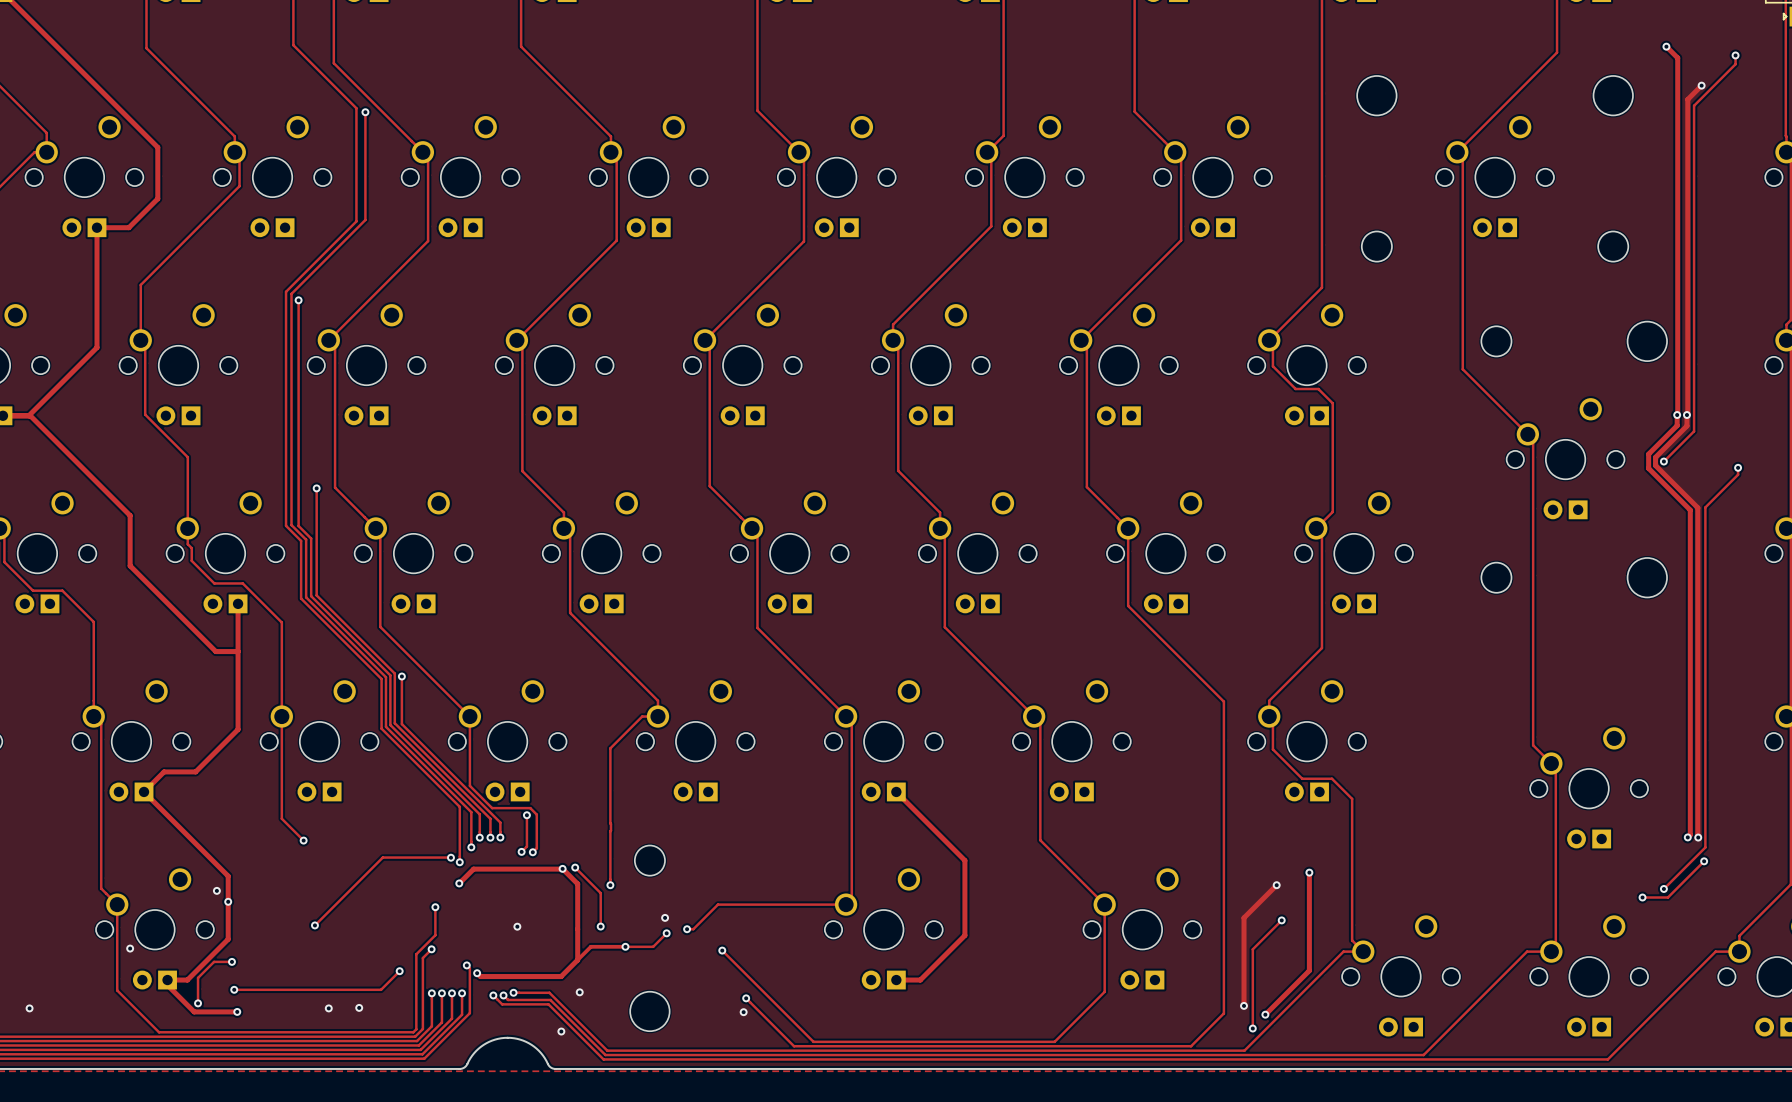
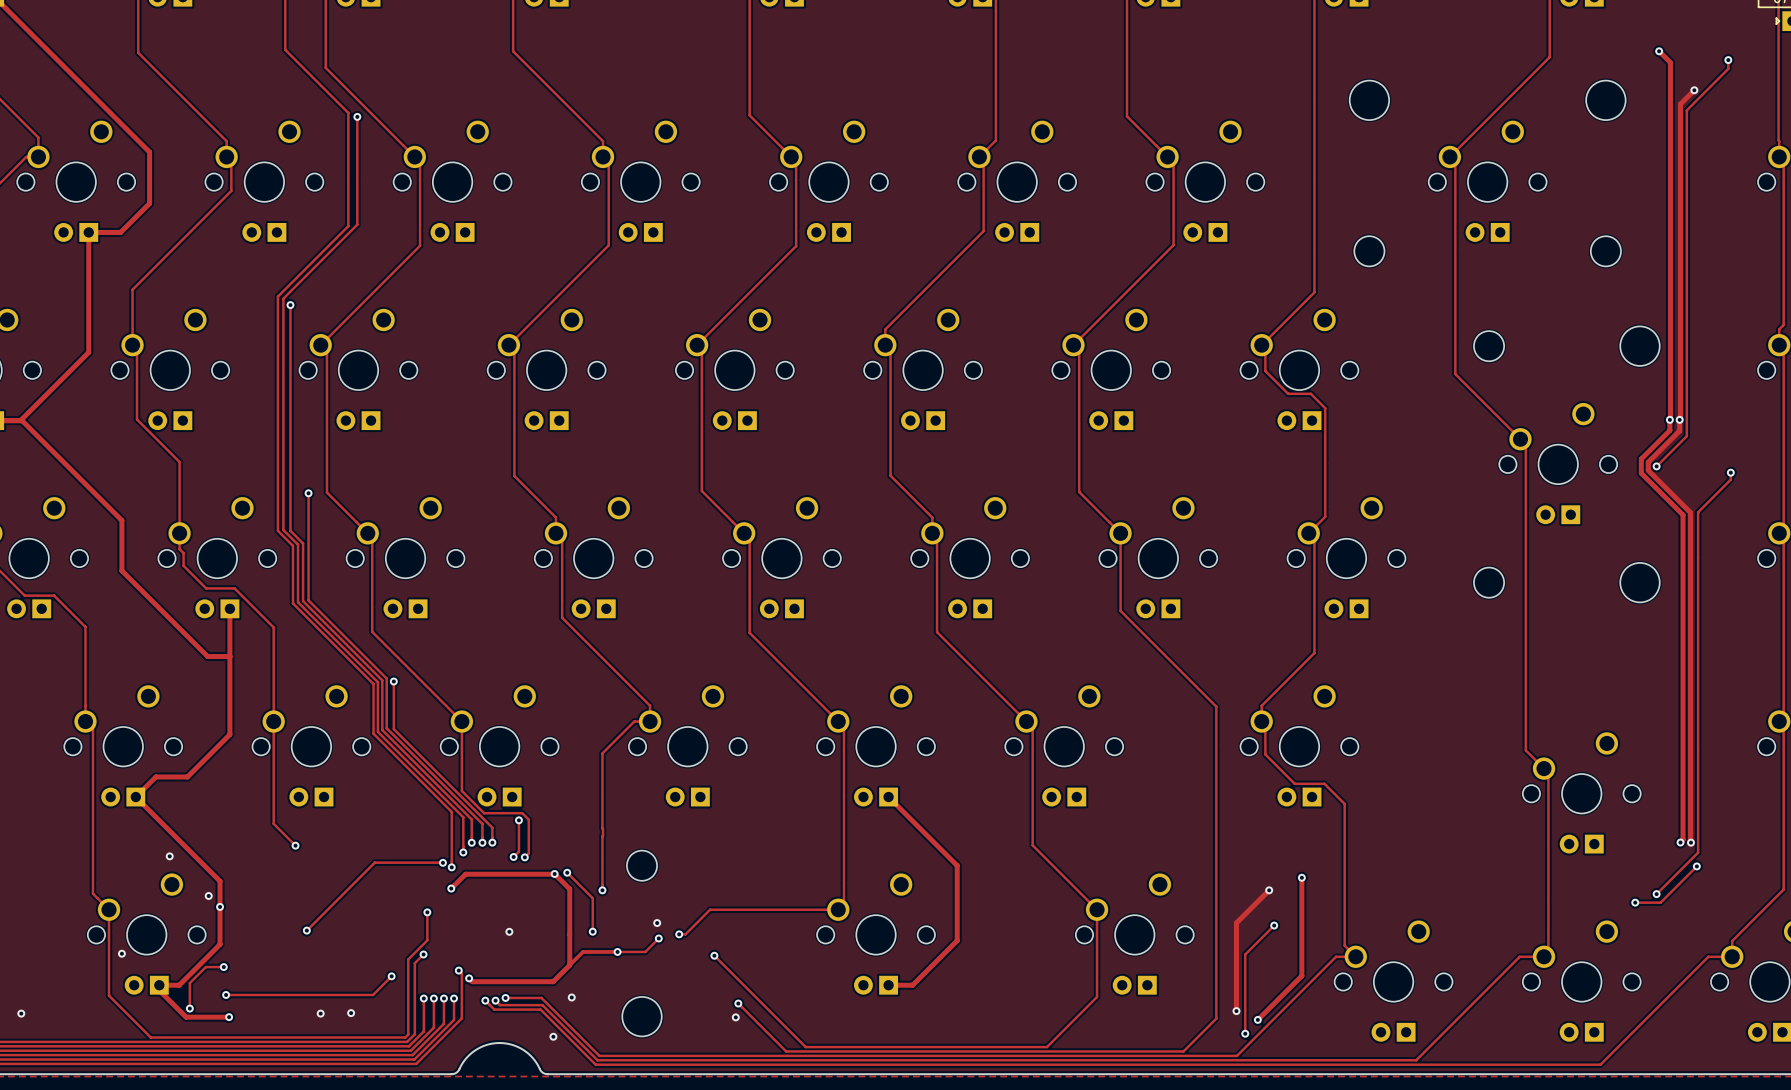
via: none -> (169, 856)

